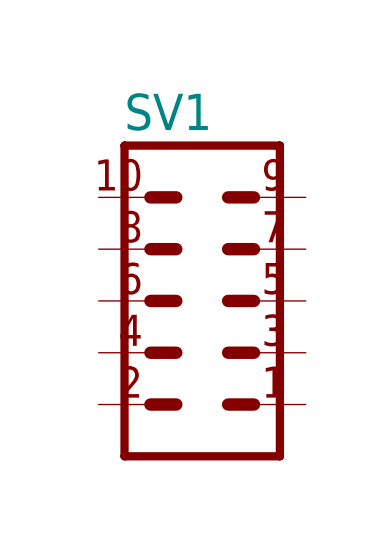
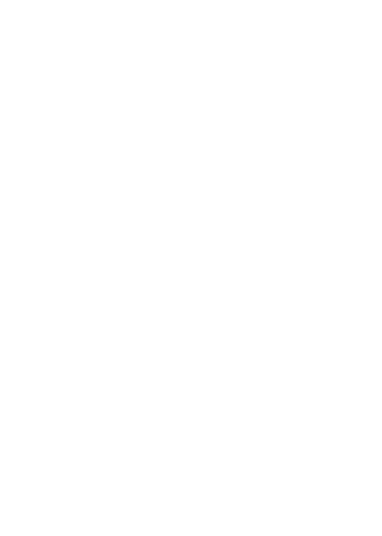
SV1: (202, 300) -> none

